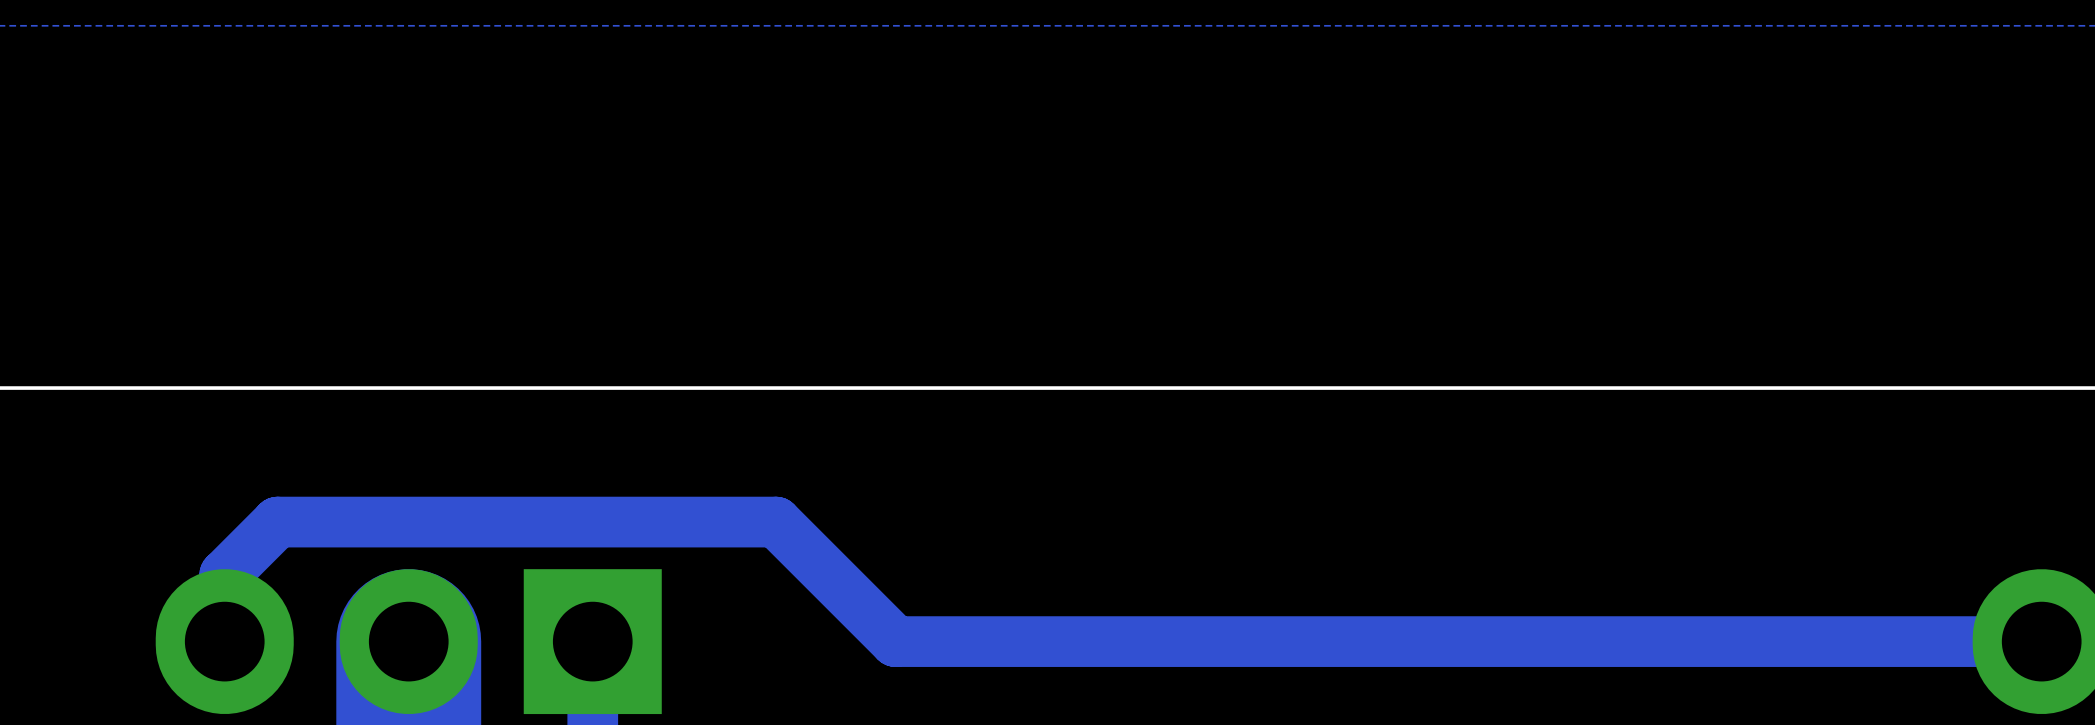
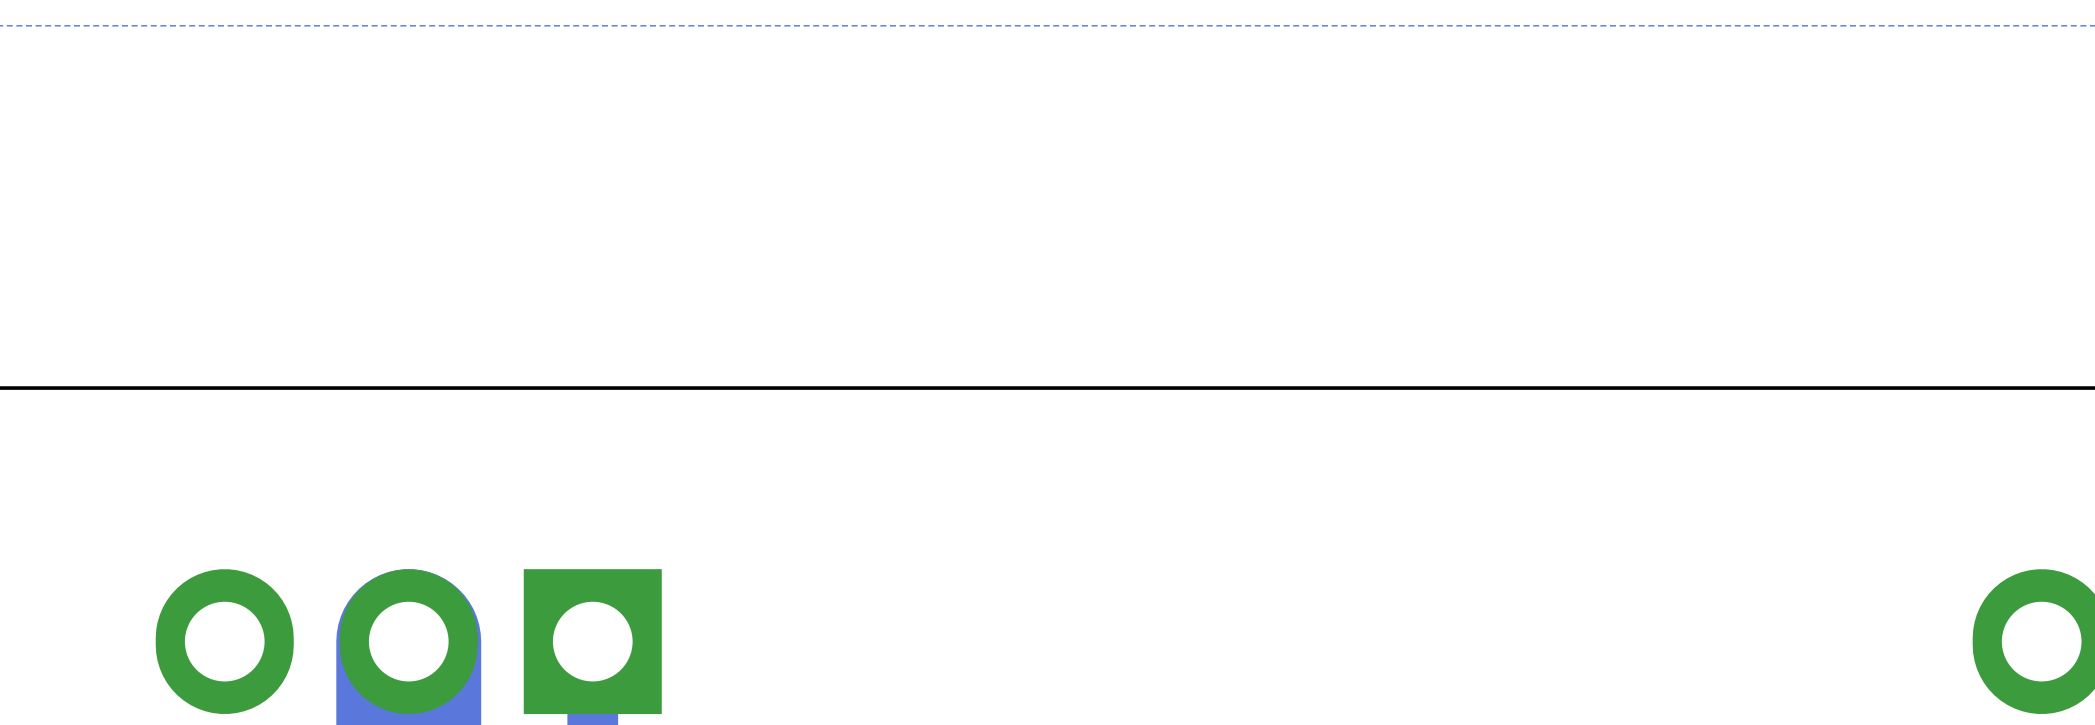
track: (2041, 641) (895, 641) (776, 522) (277, 522) (224, 574) (224, 641) -> none

